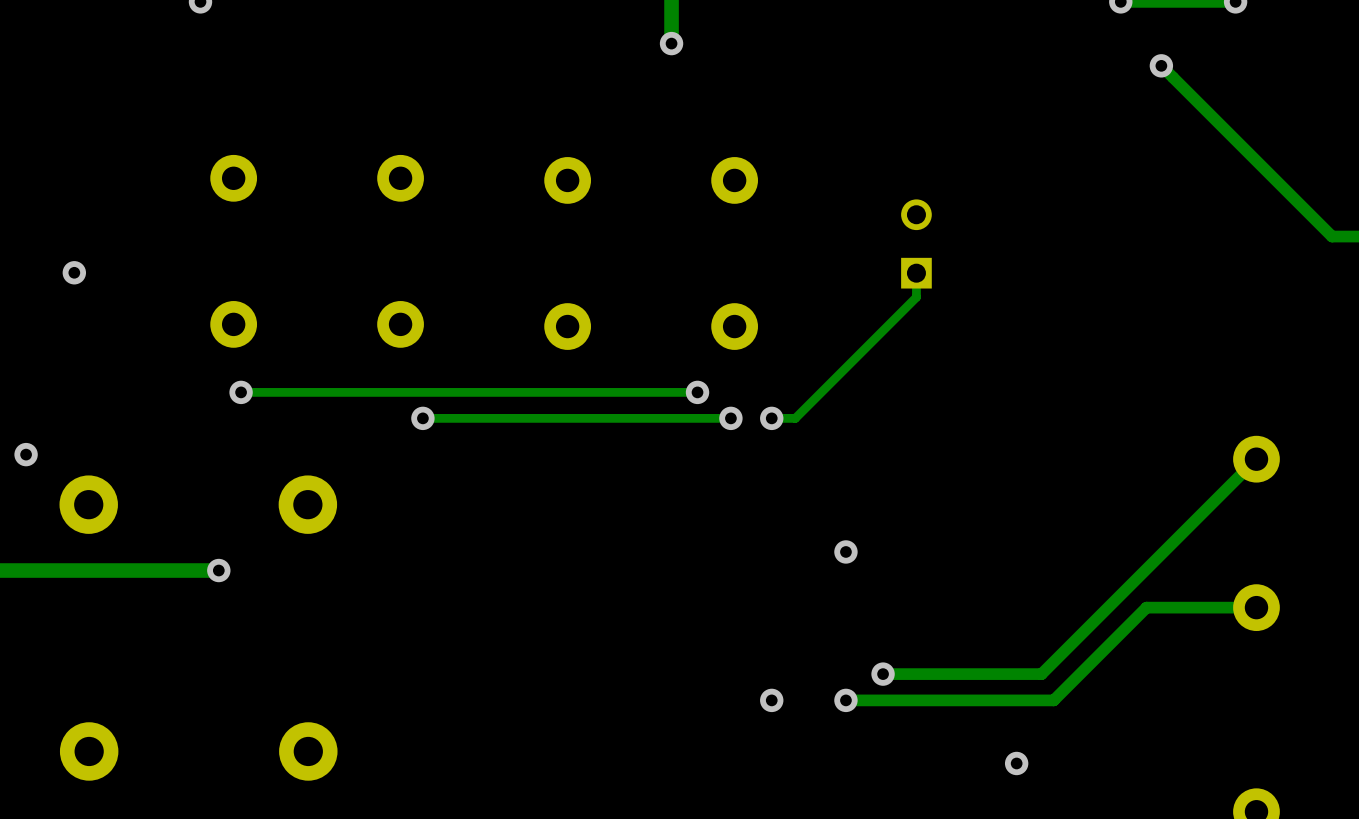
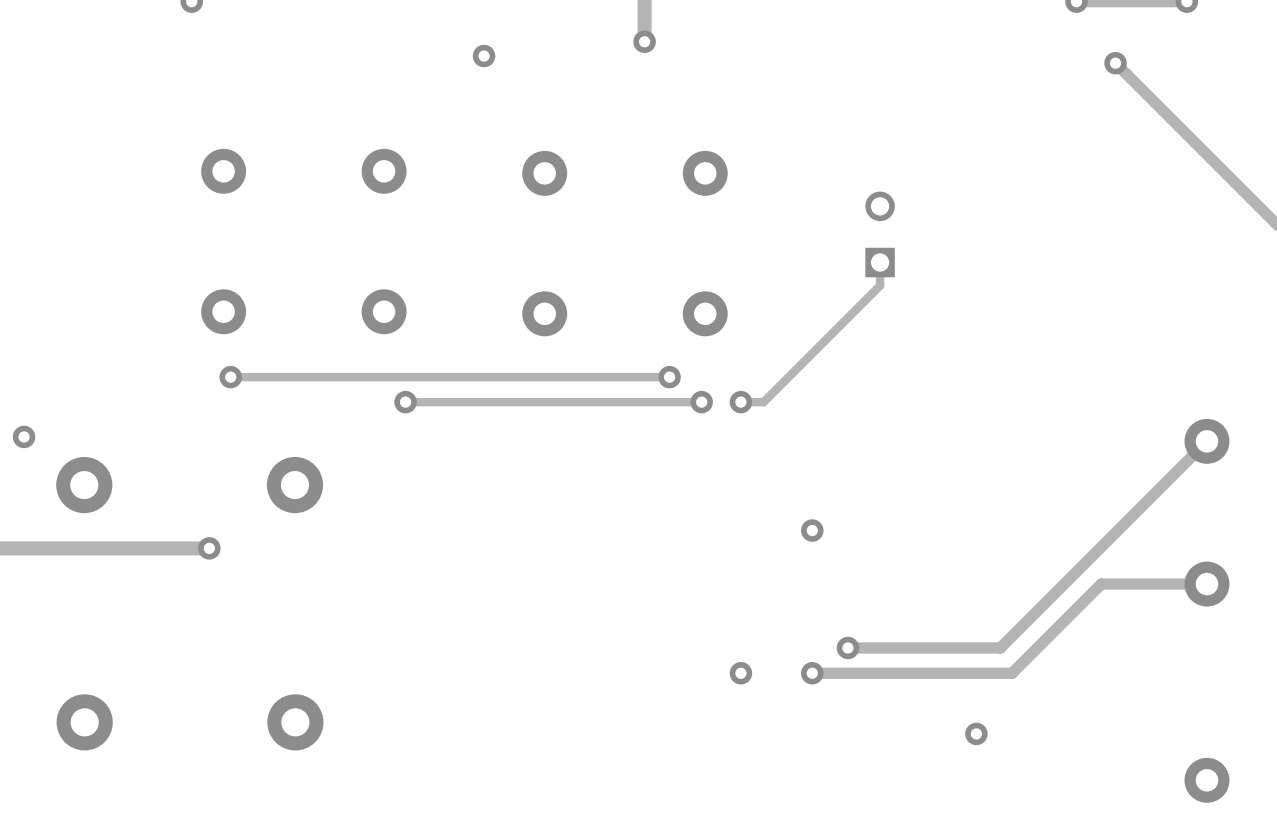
via: none -> (484, 56)
via: (74, 272) -> none

